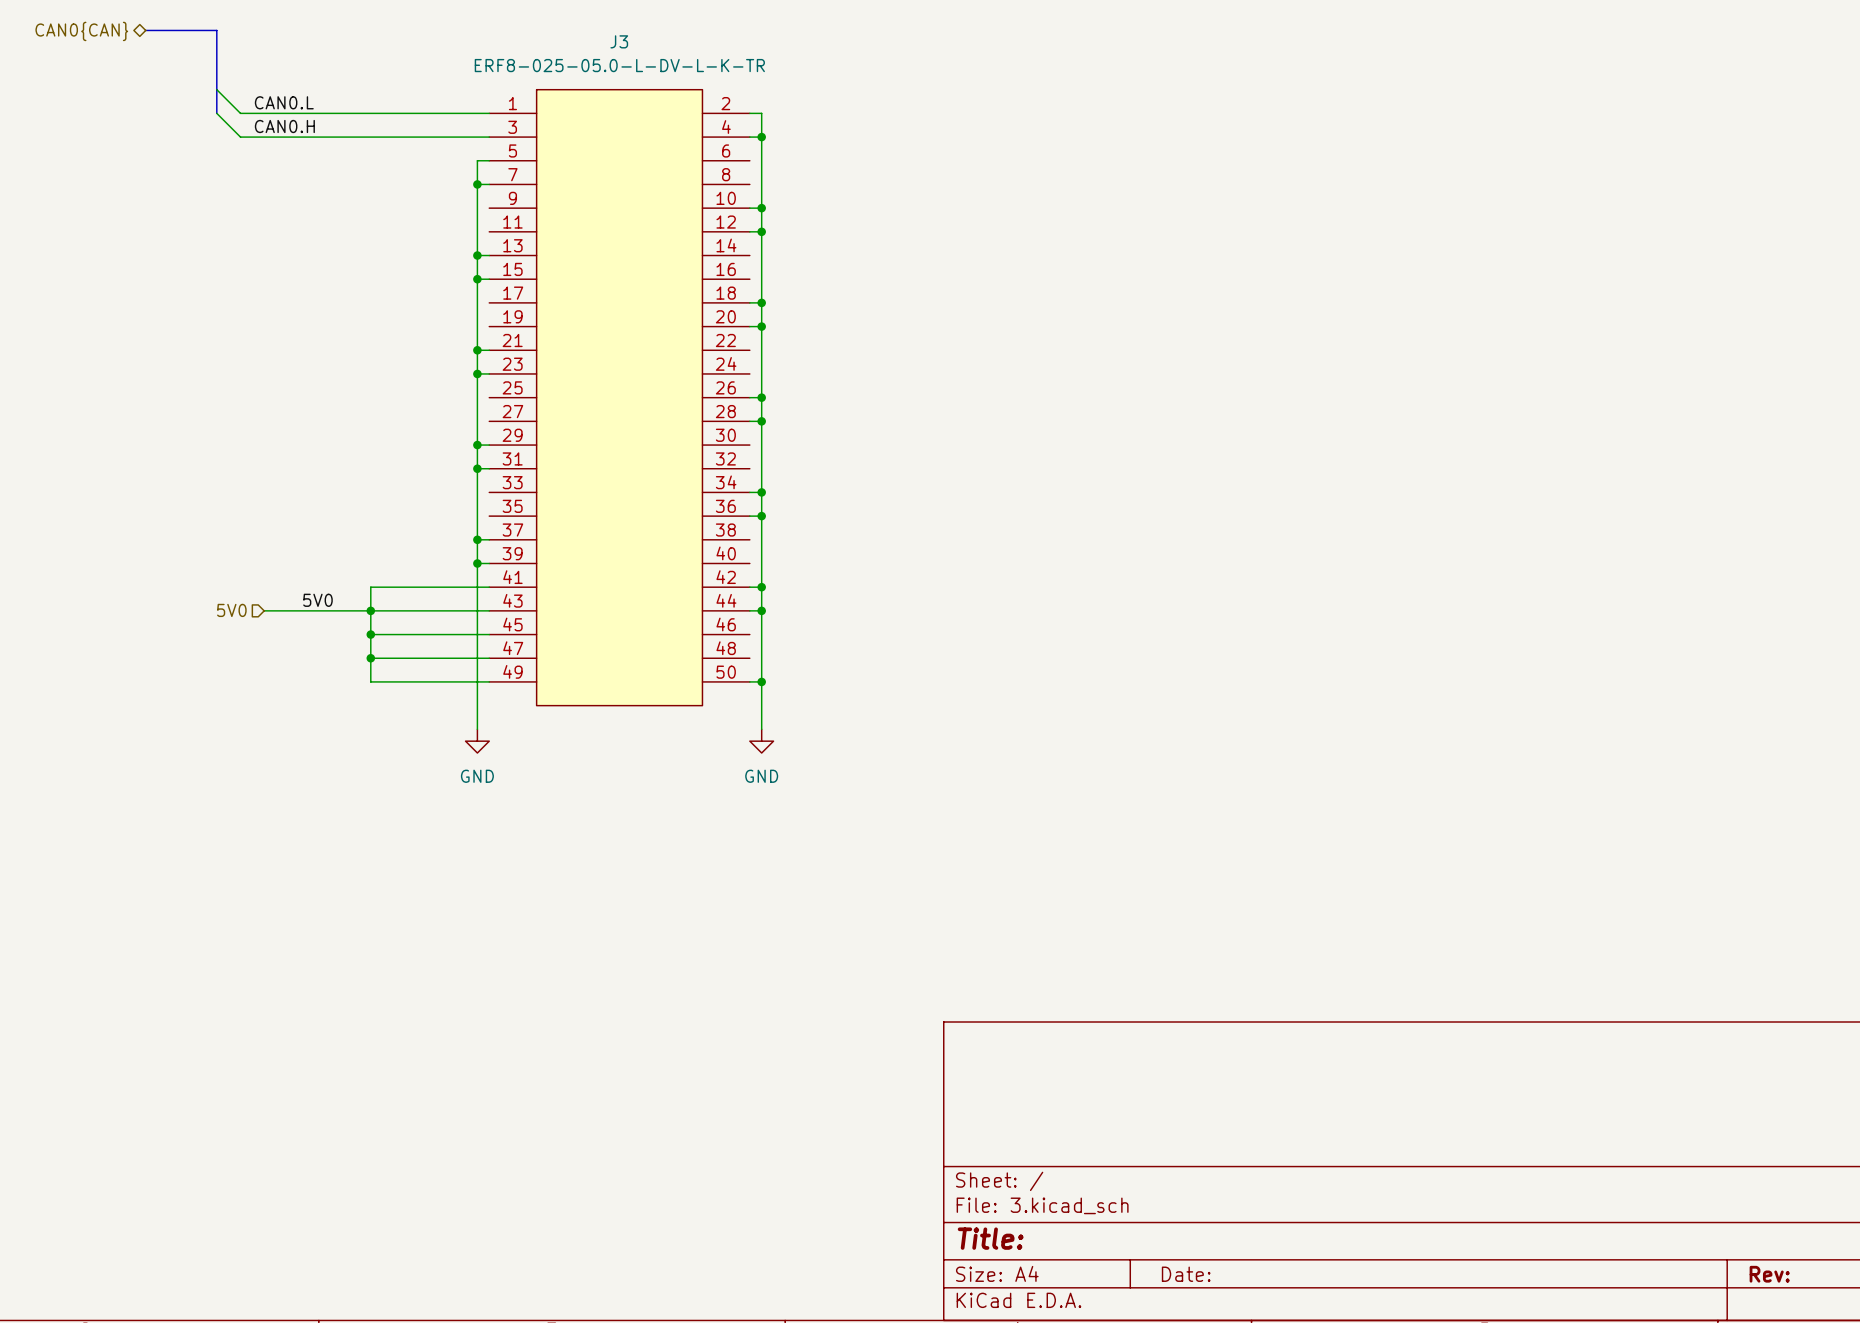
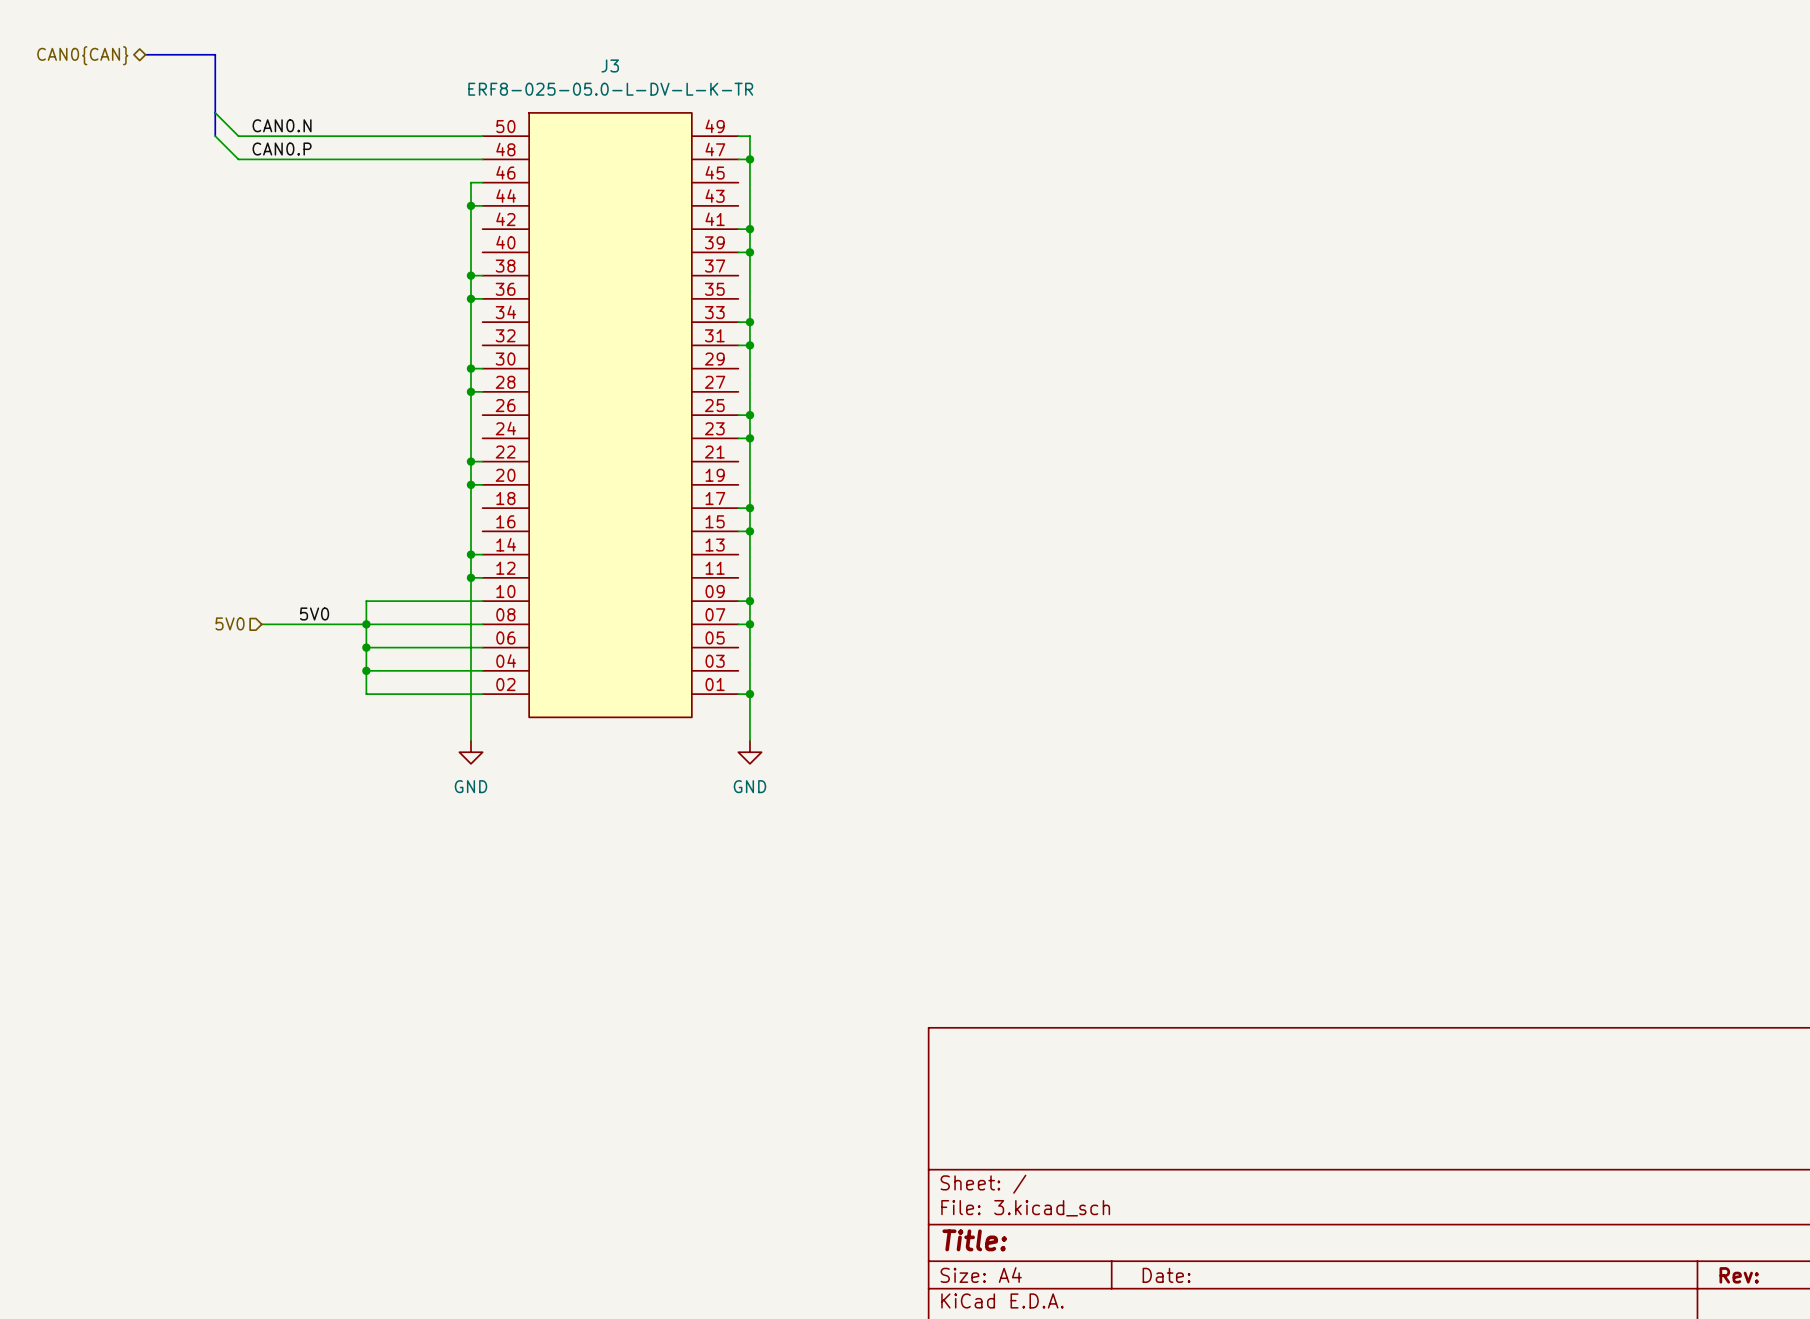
J3 symbol: [489, 89, 750, 706] -> [482, 112, 739, 718]
label: CAN0.L (284, 102) -> CAN0.N (282, 125)
label: CAN0.H (284, 126) -> CAN0.P (282, 149)

